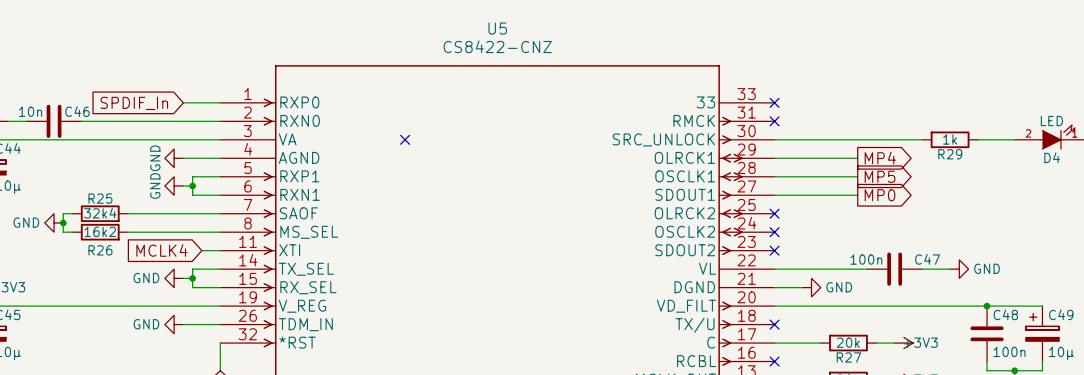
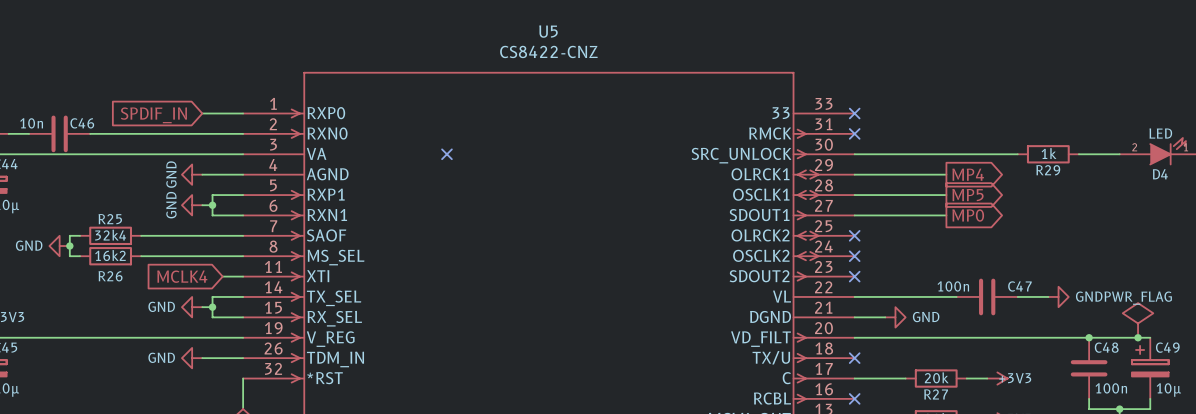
global label: SPDIF_In (134, 103) -> SPDIF_IN (153, 115)
power symbol: none -> PWR_FLAG (1138, 318)
junction: none -> (1138, 337)

